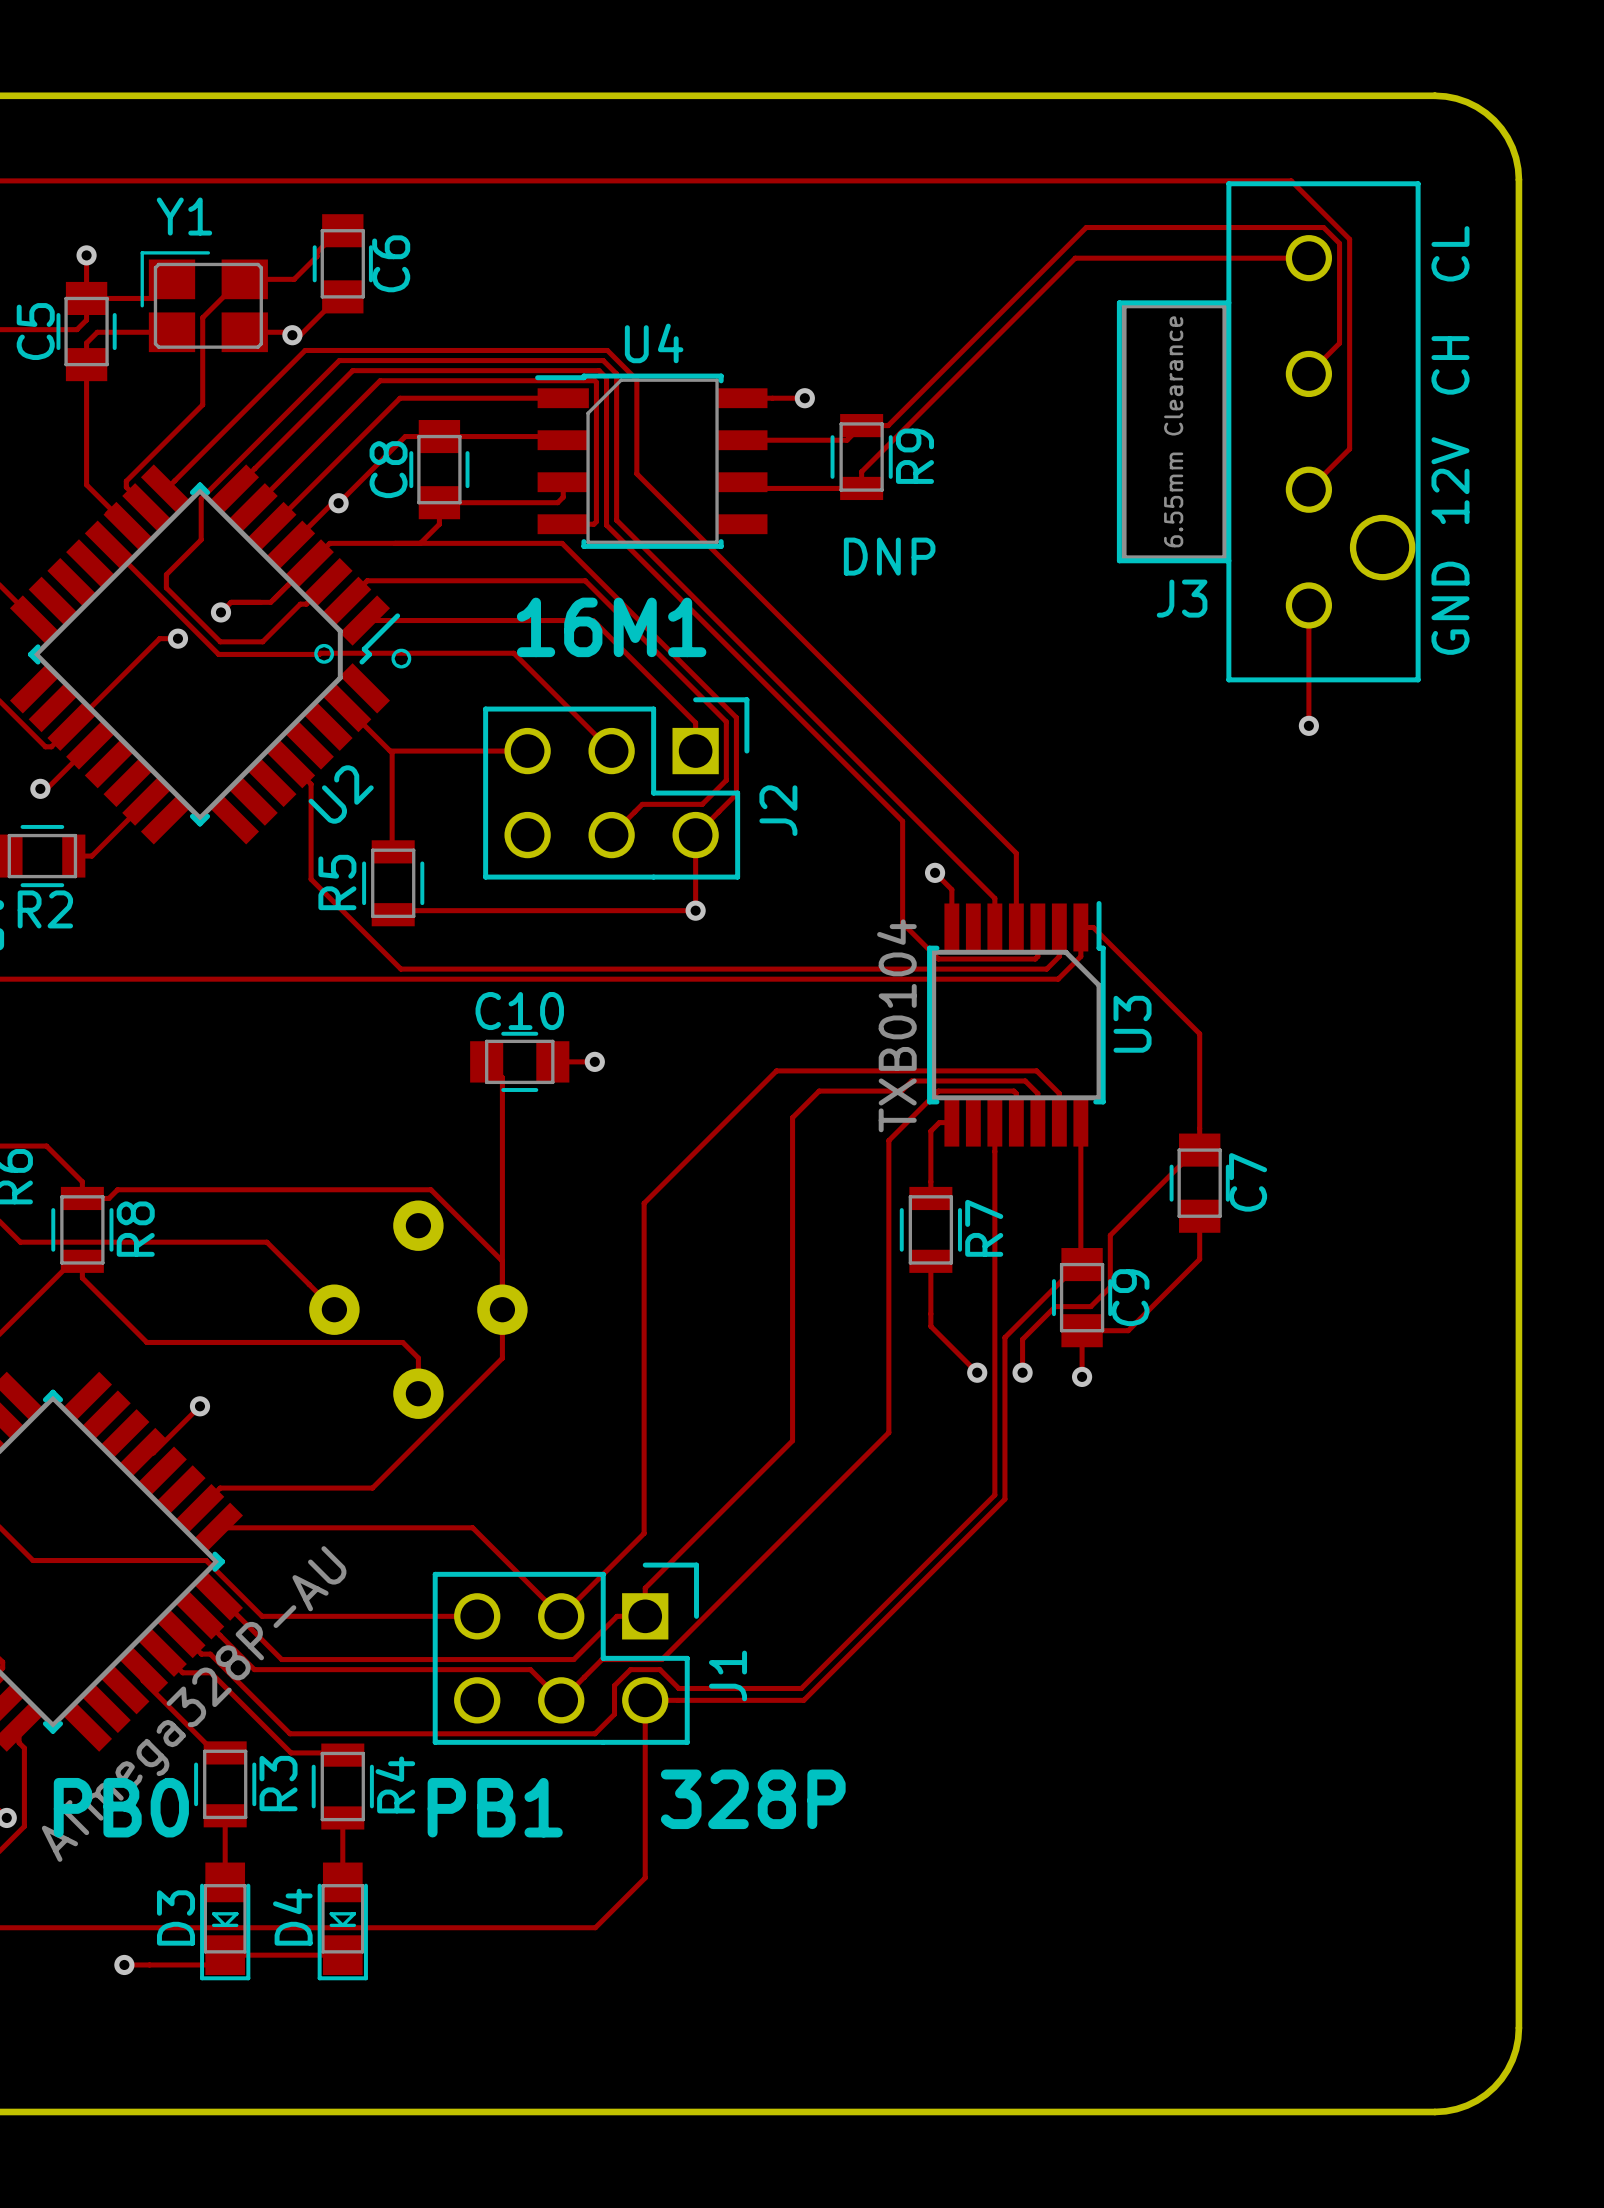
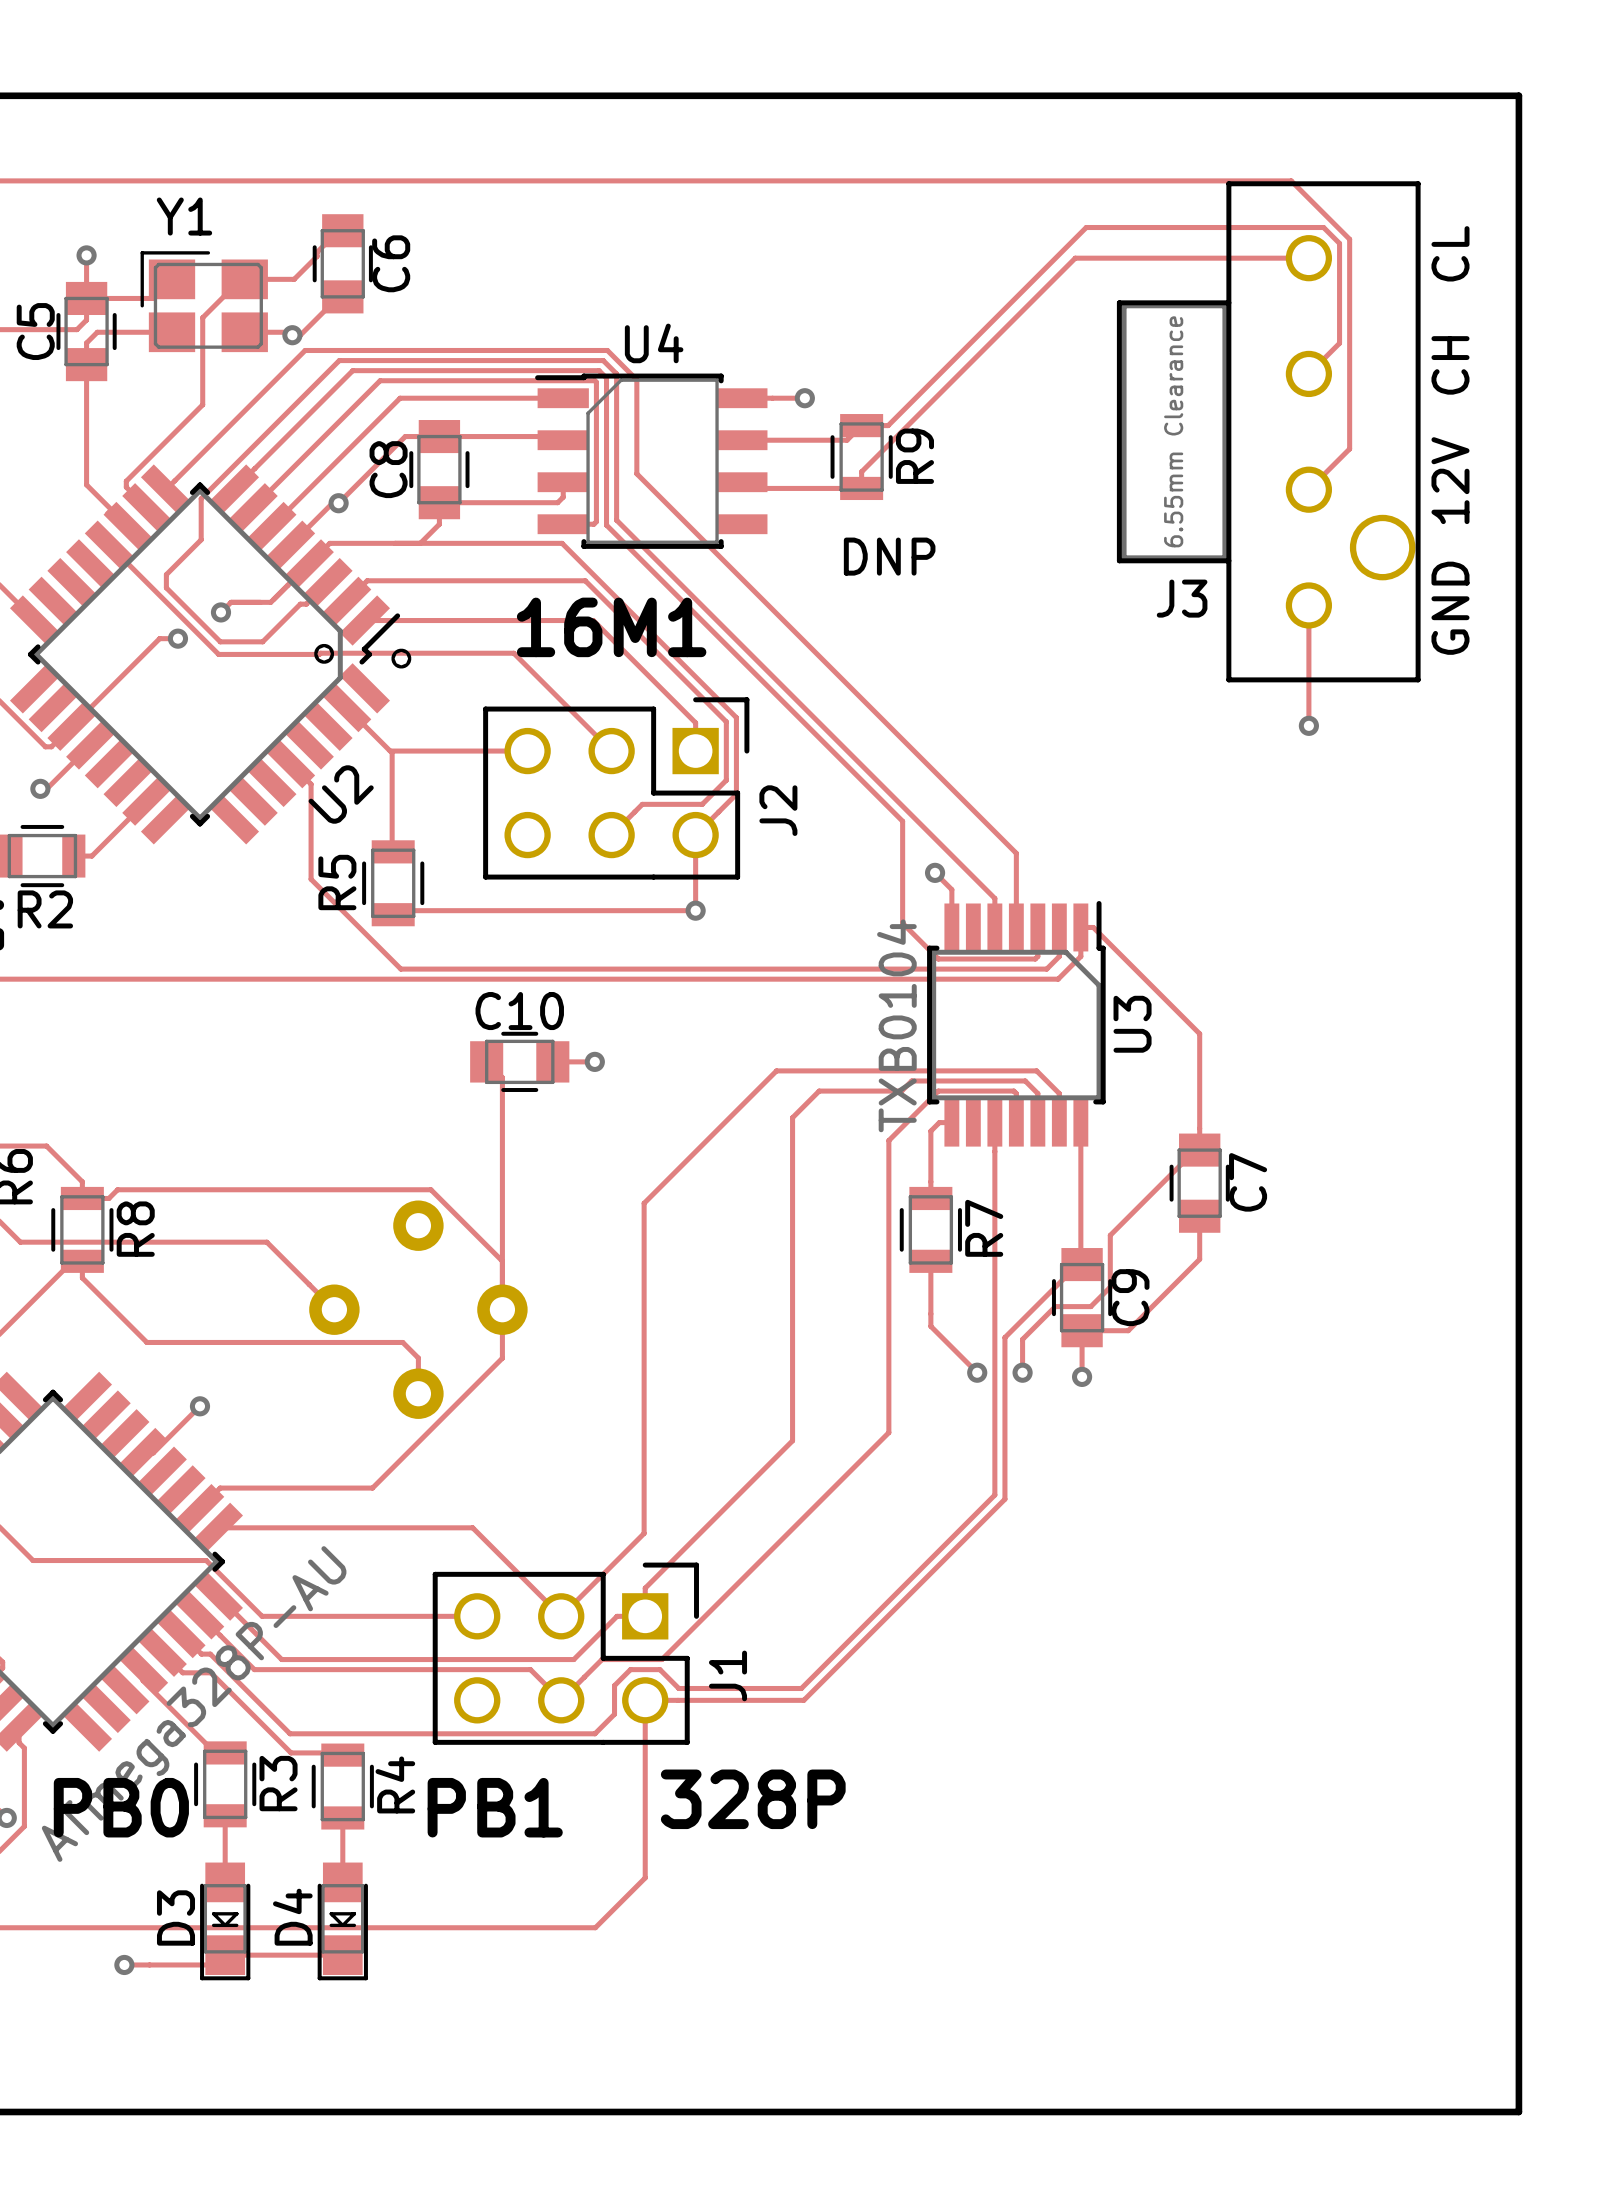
board edge: (1434, 95) (1467, 102) (1494, 120) (1512, 147) (1518, 179) -> (1434, 95) (1518, 95) (1518, 179)
board edge: (1518, 2027) (1512, 2060) (1494, 2087) (1467, 2105) (1434, 2111) -> (1518, 2027) (1518, 2111) (1434, 2111)

